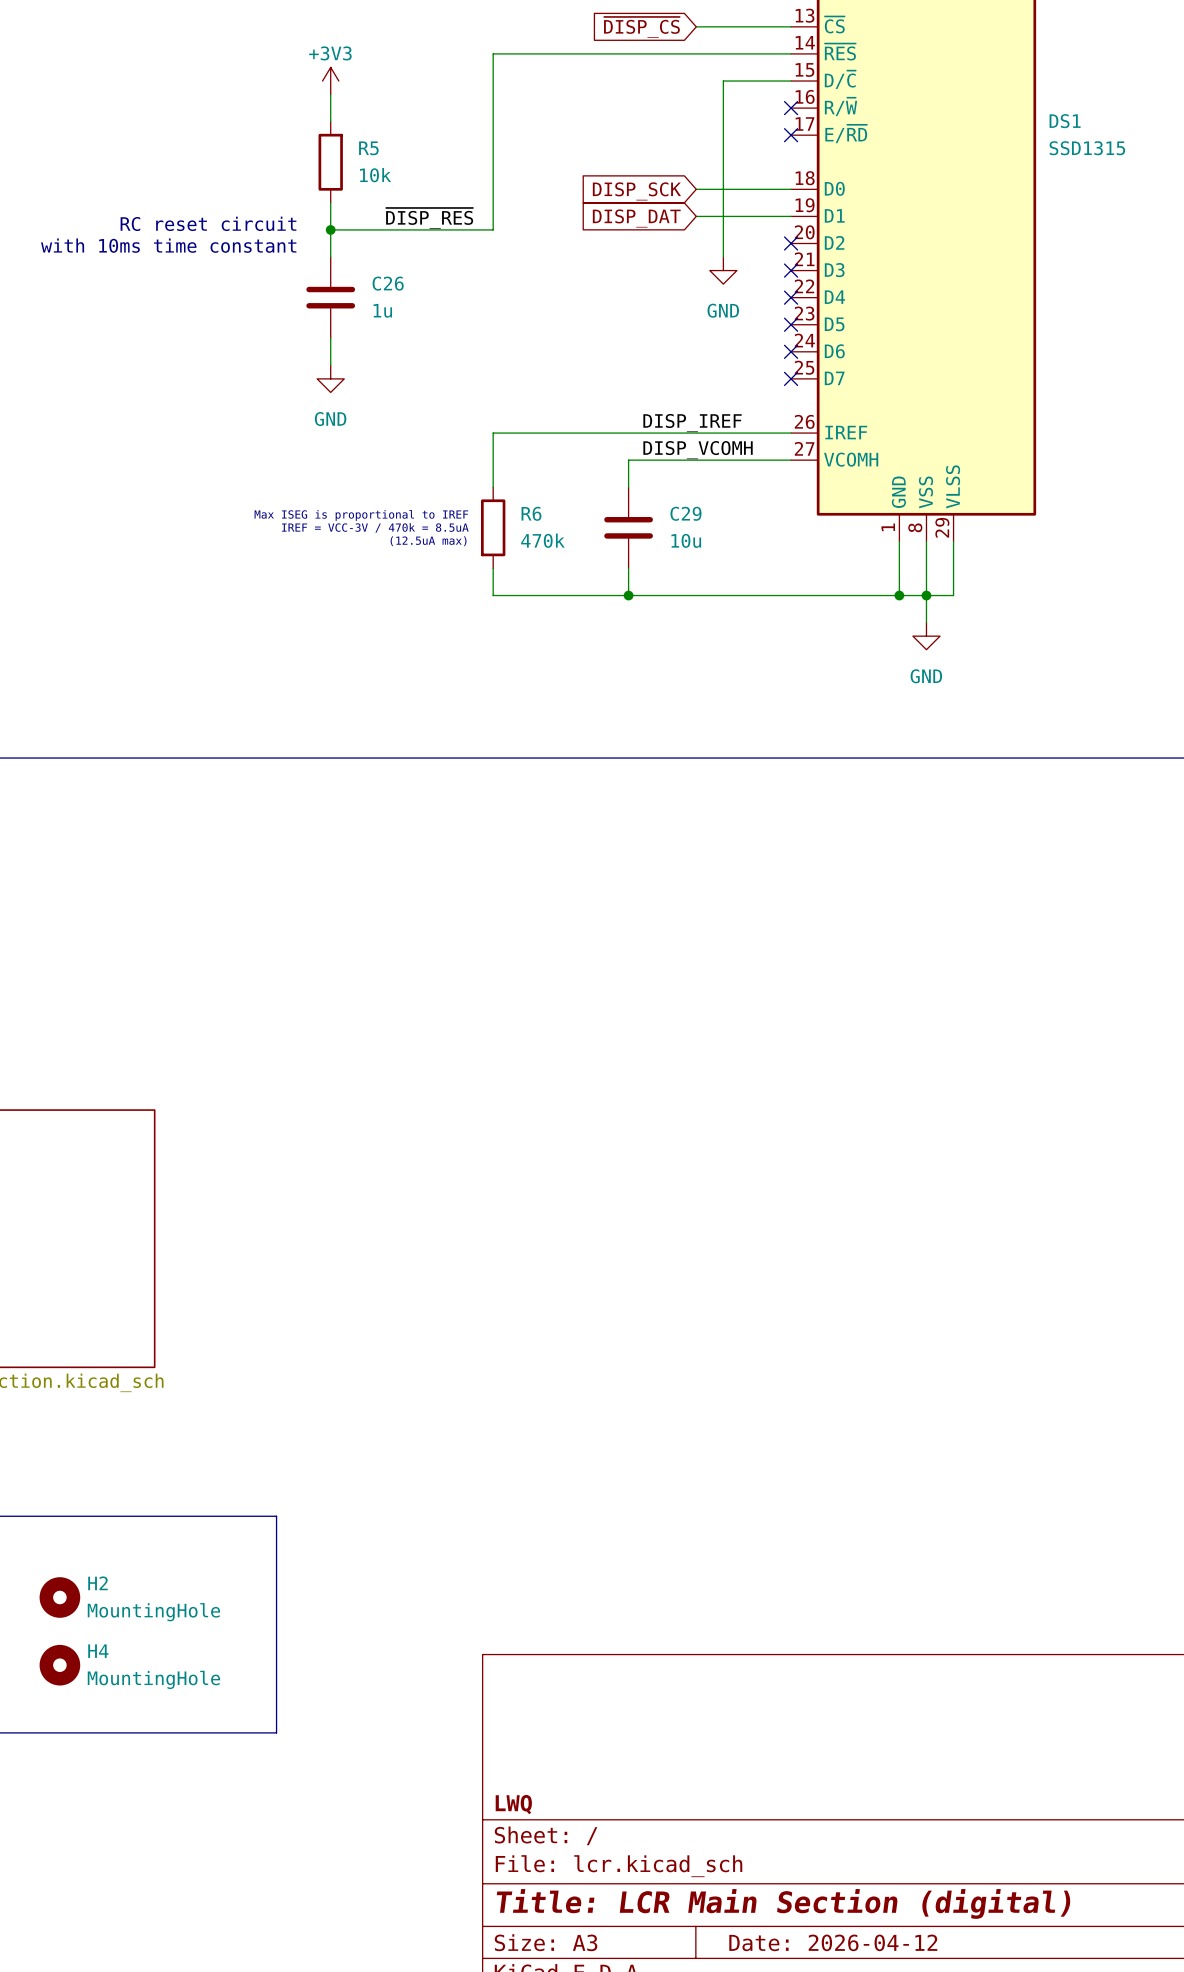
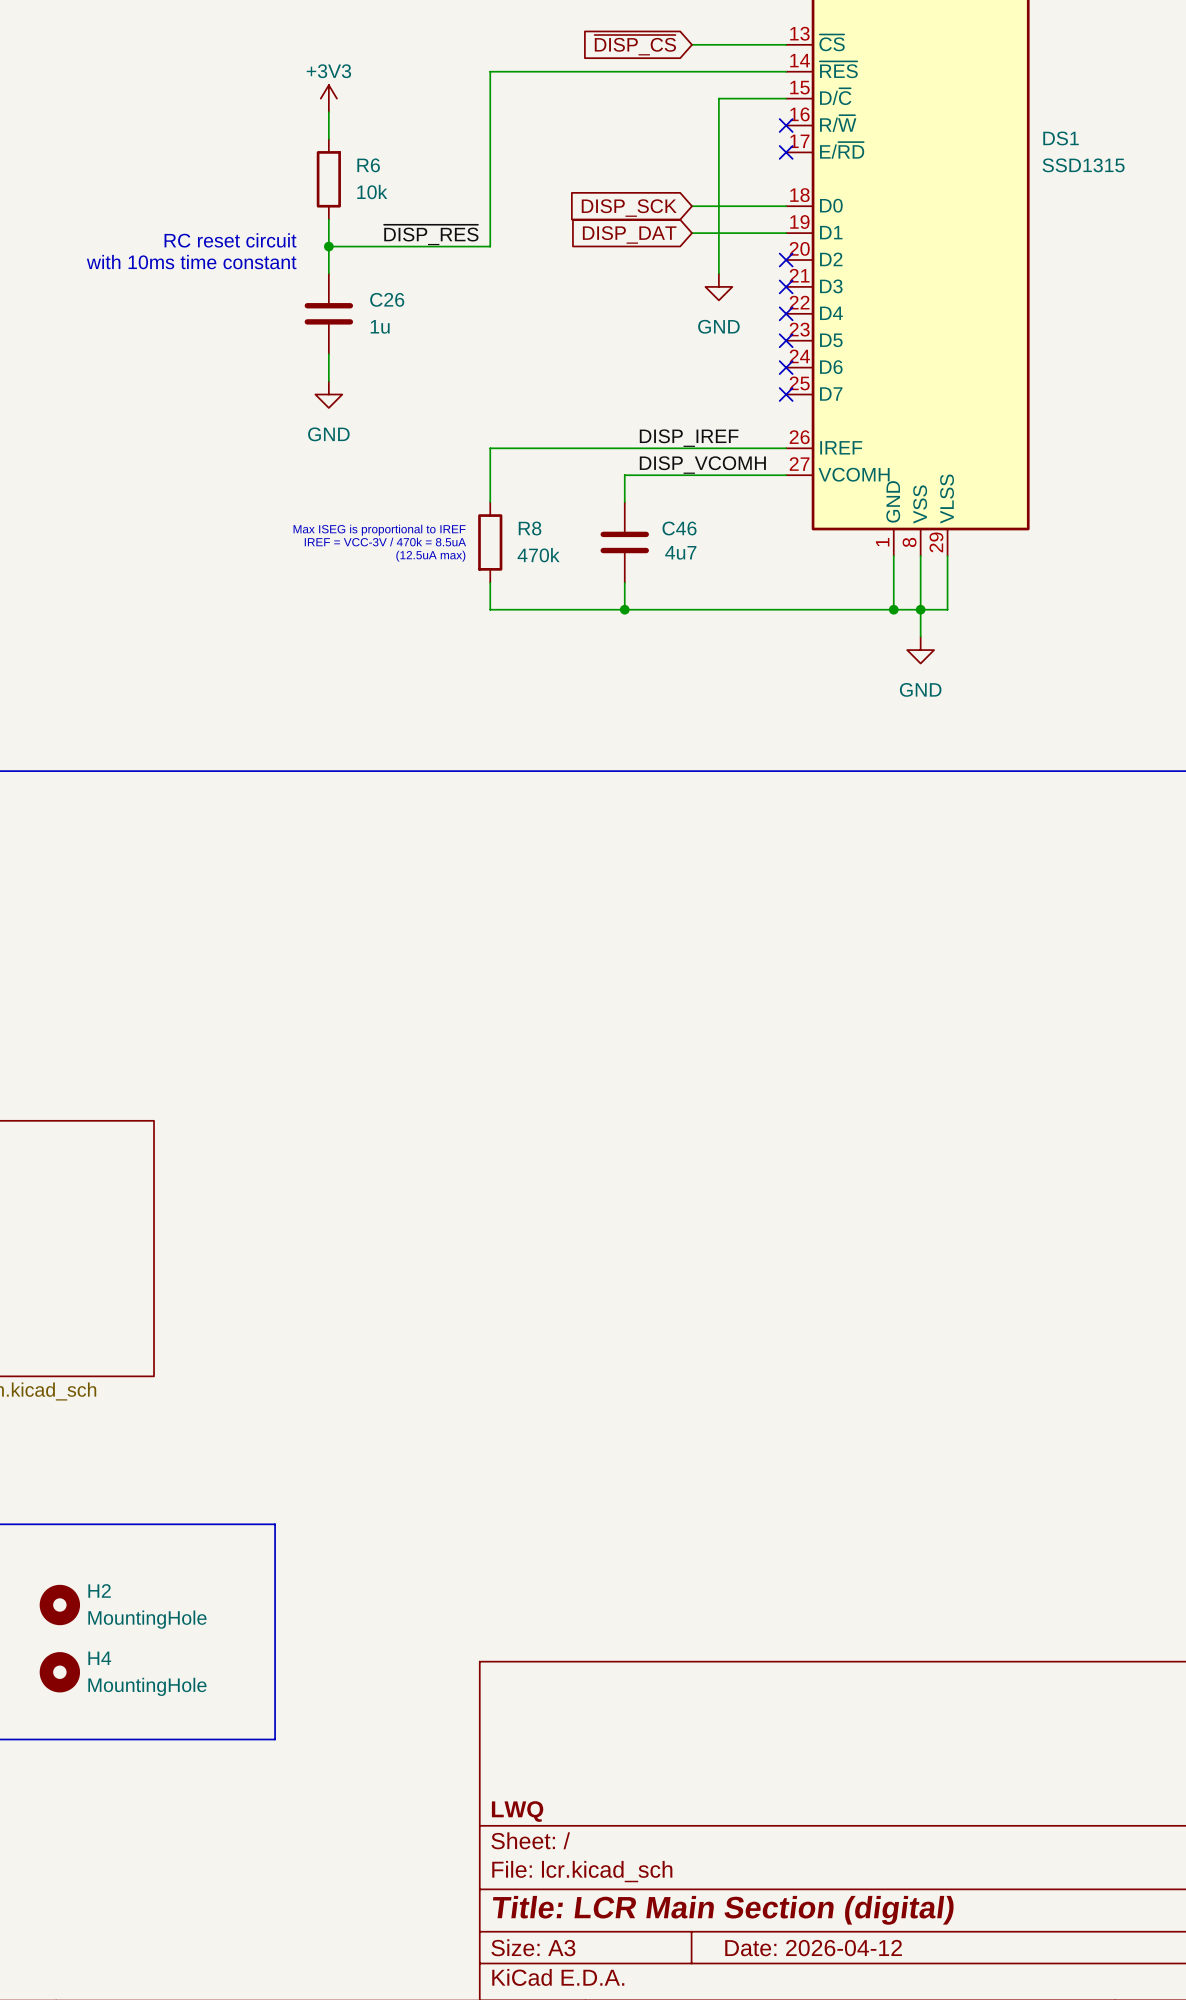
R5 name: R5 (368, 148) -> R6 (368, 165)
R6 name: R6 (531, 513) -> R8 (530, 528)
C29 name: C29 (685, 513) -> C46 (679, 528)
C29 value: 10u (686, 540) -> 4u7 (680, 552)

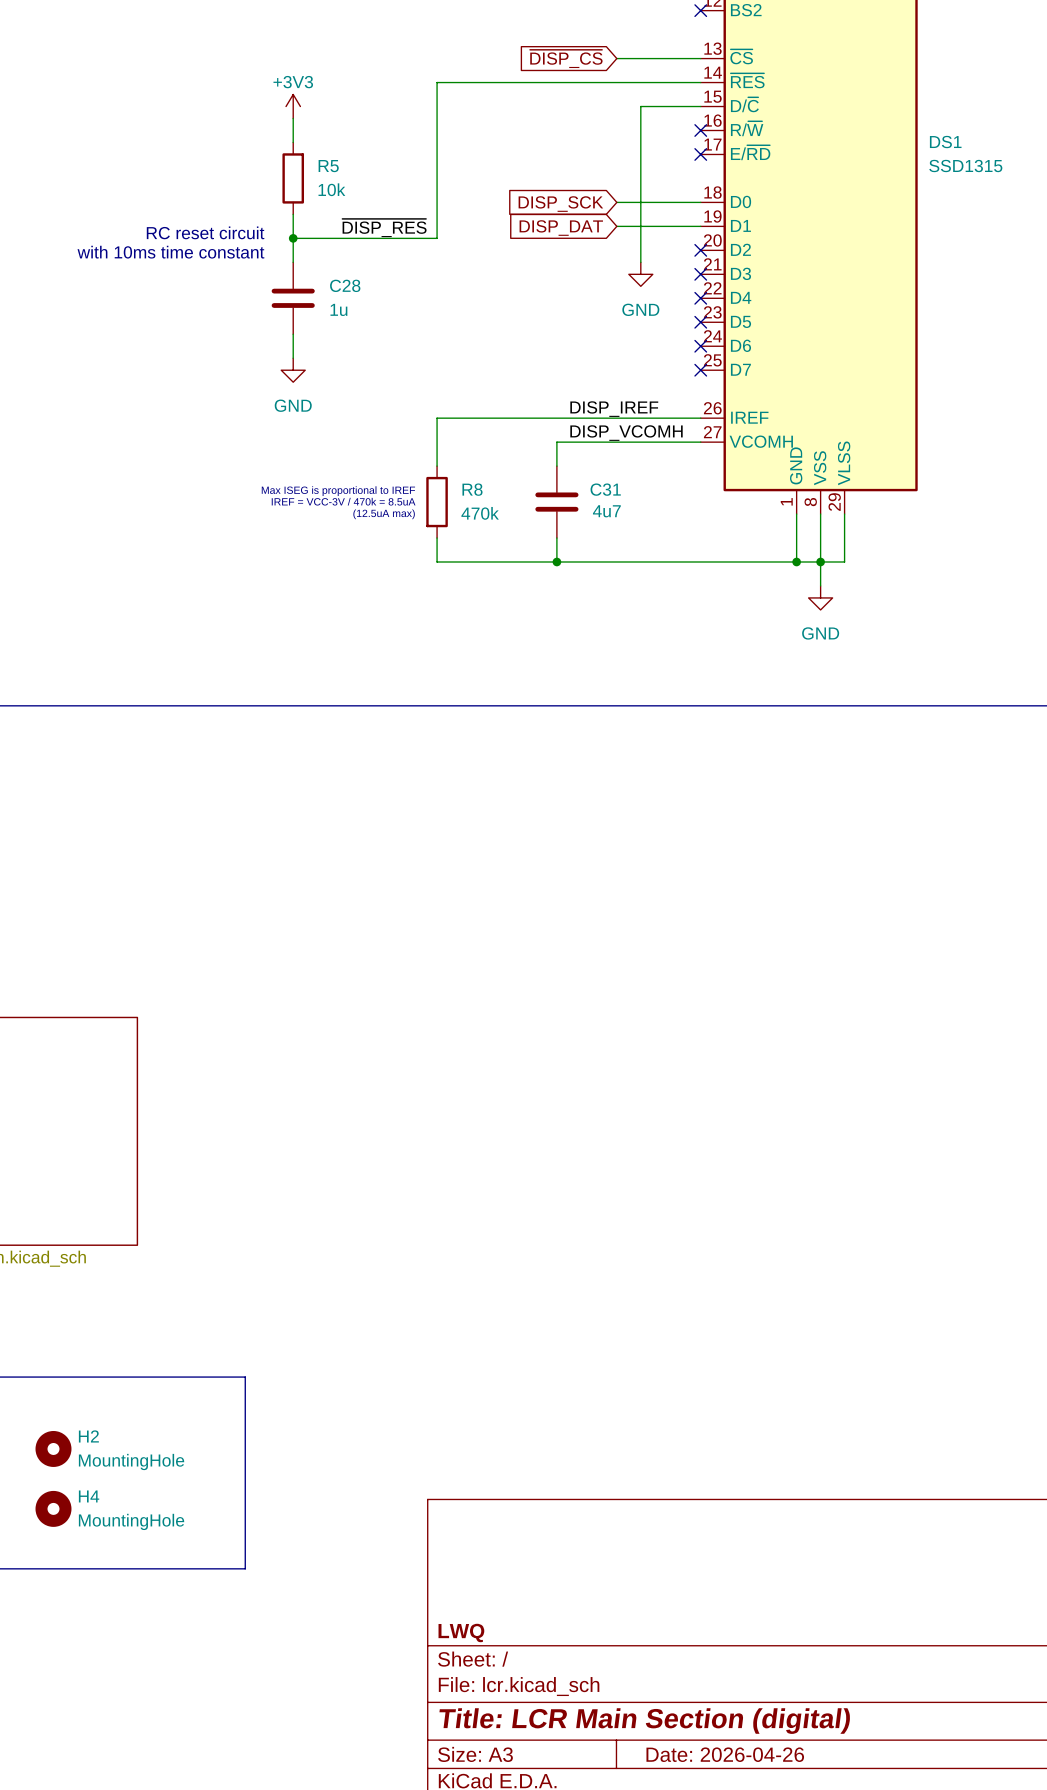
R6 name: R6 (368, 165) -> R5 (328, 166)
C26 name: C26 (387, 299) -> C28 (345, 285)
C46 name: C46 (679, 528) -> C31 (605, 489)
title block: Date: 2026-04-12 (813, 1948) -> Date: 2026-04-26 (725, 1754)

